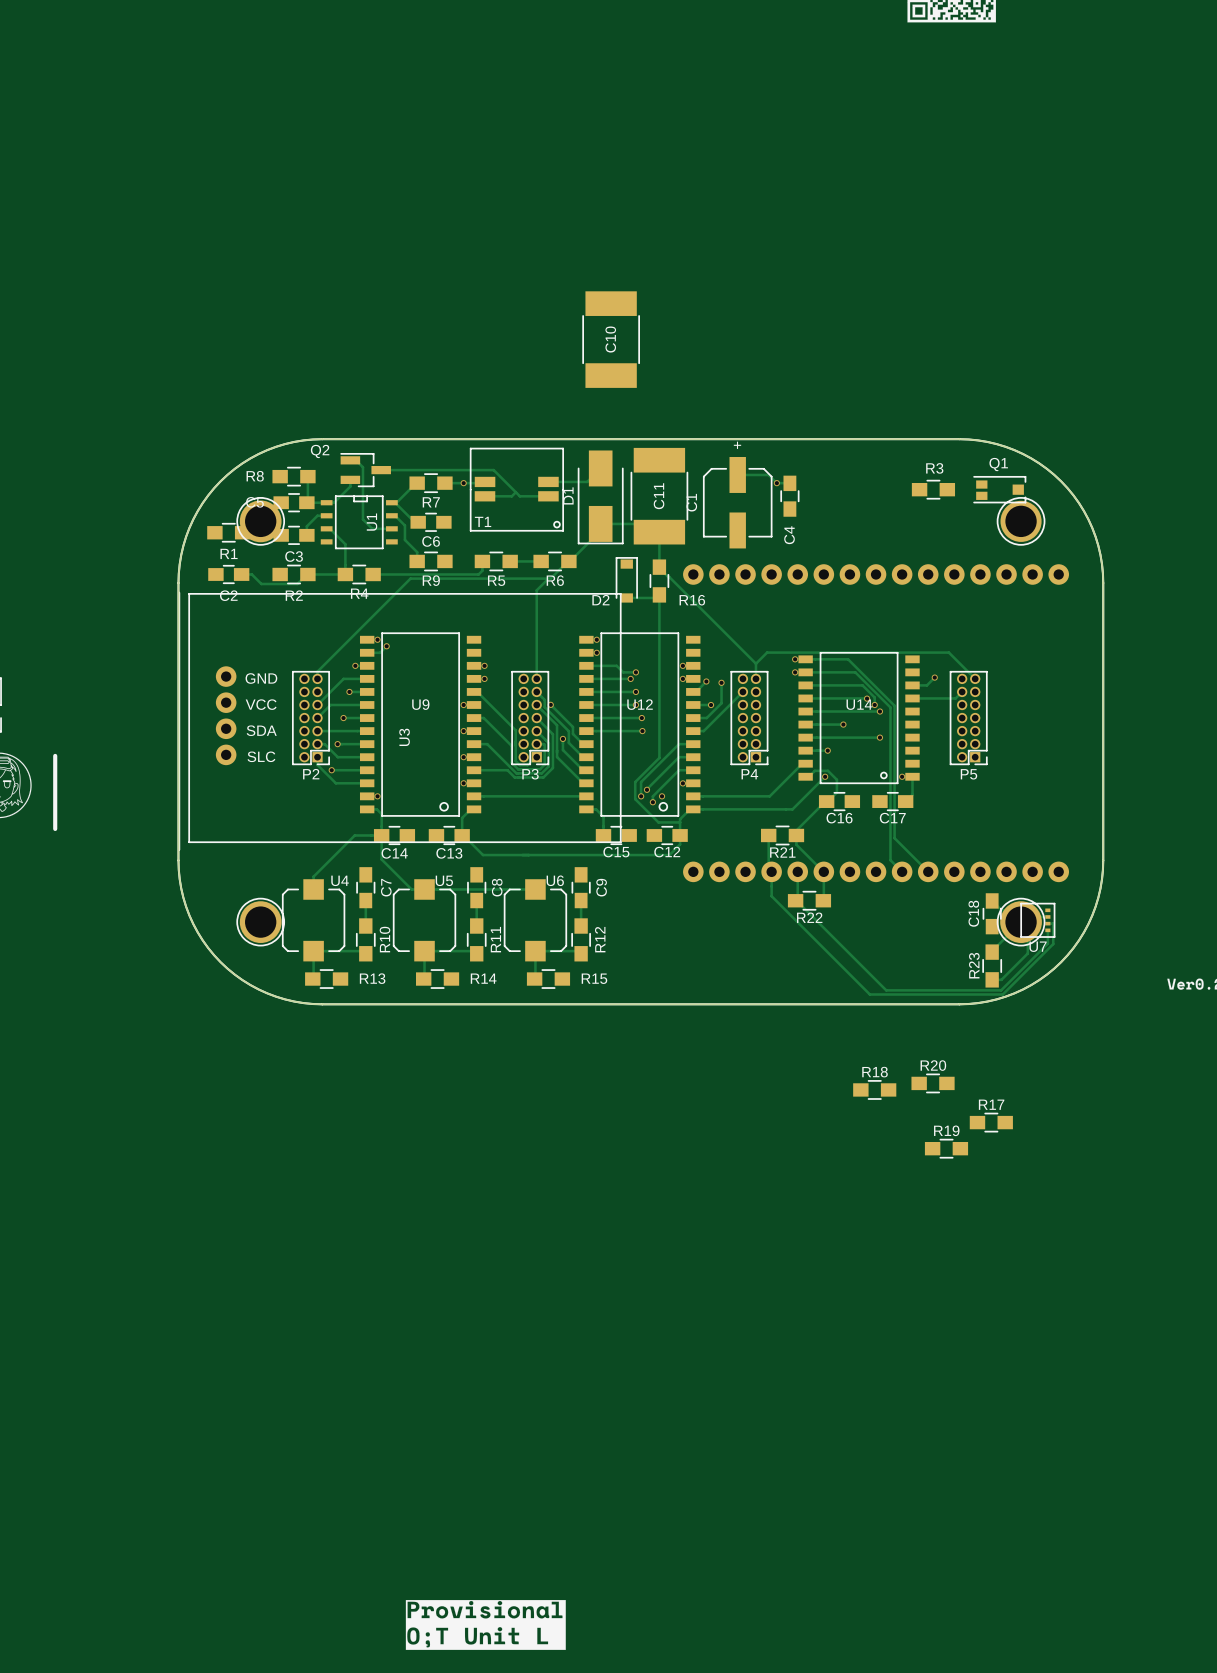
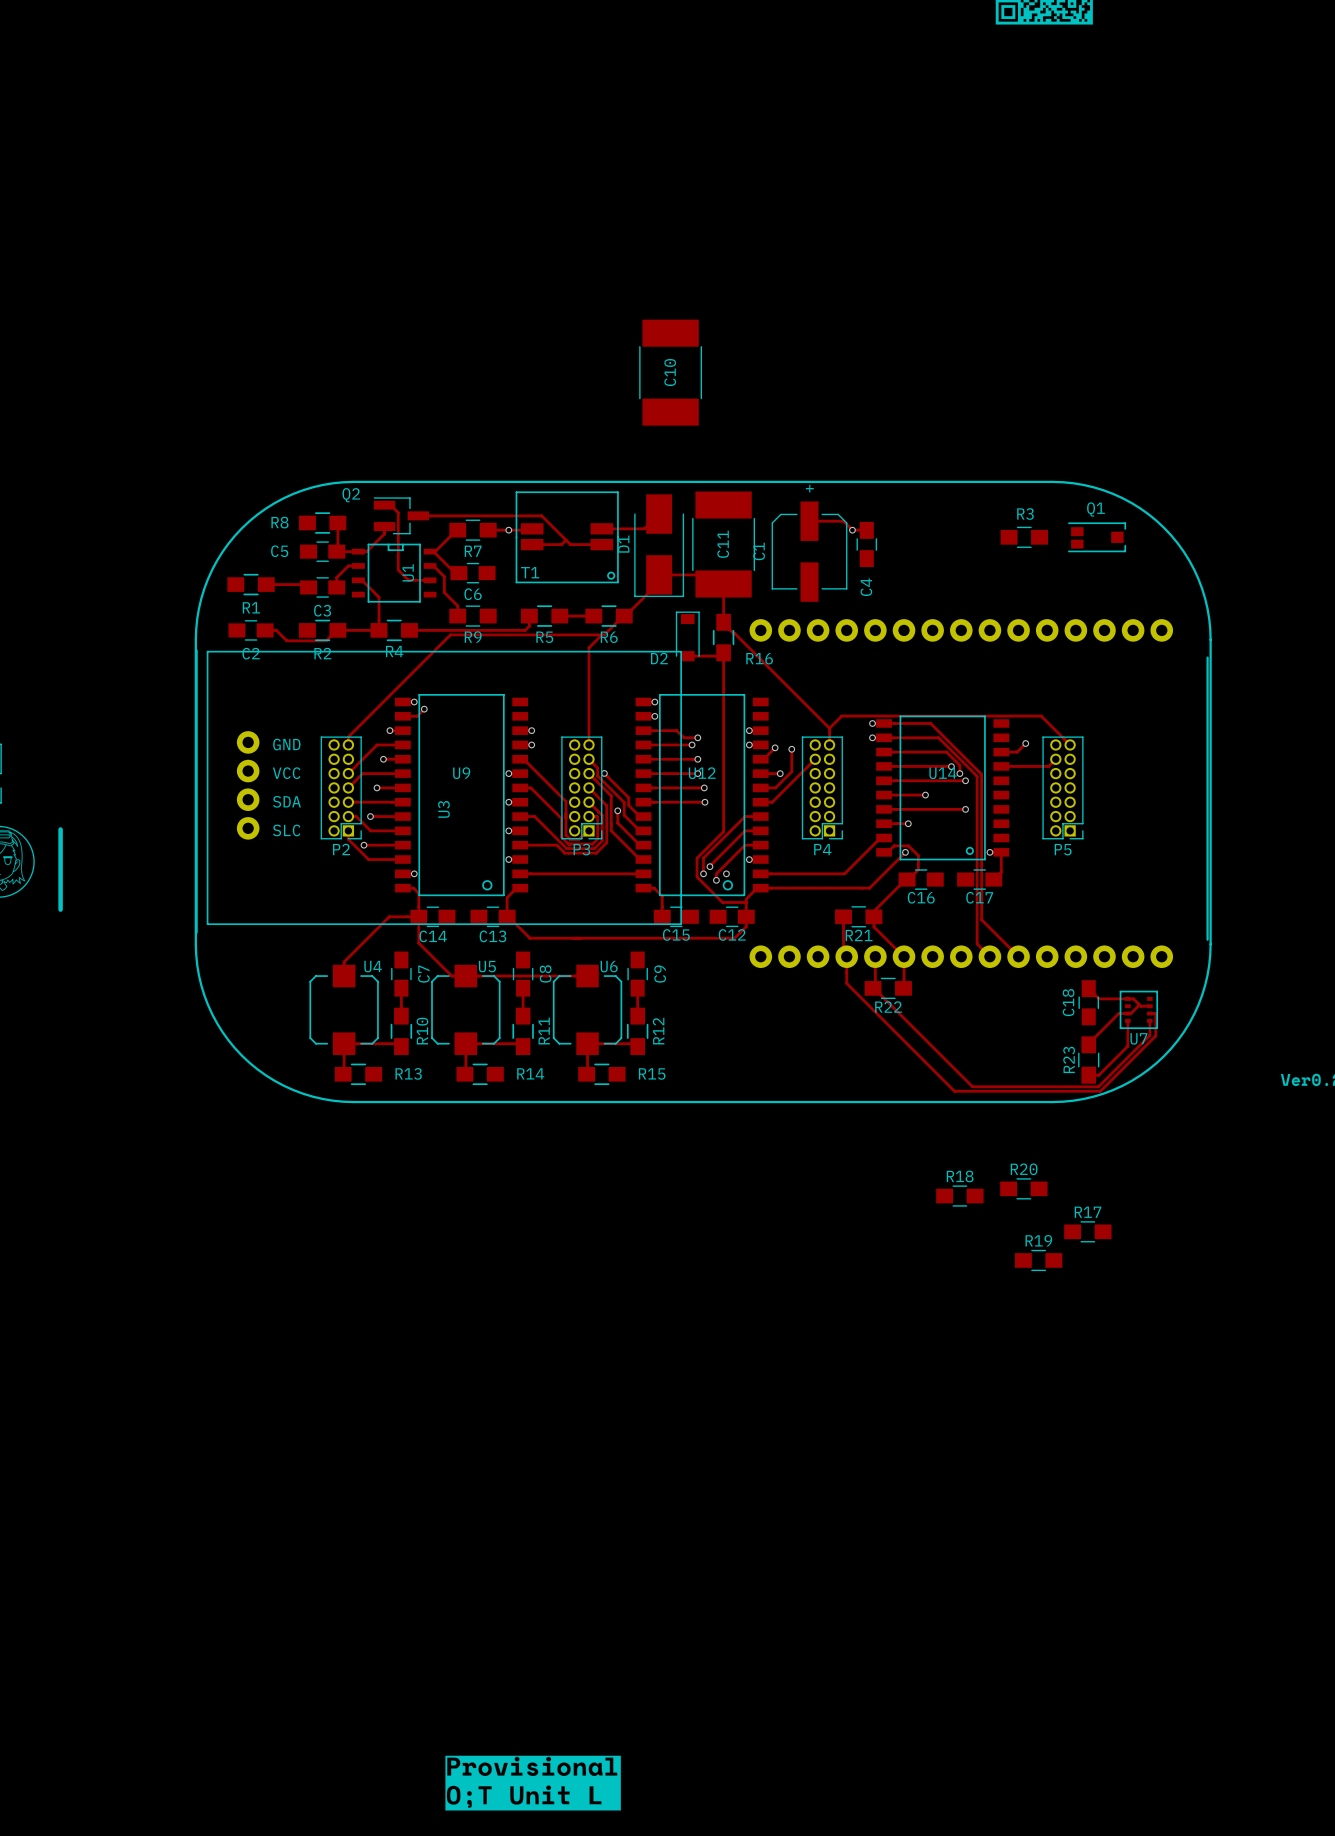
board edge: (322, 439) (968, 439) (1005, 446) (1039, 463) (1067, 488) (1083, 511) (1098, 545) (1102, 573) (1102, 869) (1095, 906) (1079, 940) (1054, 968) (1031, 985) (996, 999) (968, 1004) (312, 1004) (276, 996) (242, 980) (220, 962) (202, 940) (189, 915) (179, 879) (179, 564) (186, 536) (197, 511) (208, 495) (227, 474) (242, 463) (267, 450) (294, 441) (322, 439) -> none
part: (260, 521) -> none
part: (1021, 521) -> none
line: none -> (1207, 657) (1207, 939)
part: (260, 922) -> none
part: (1021, 922) -> none

